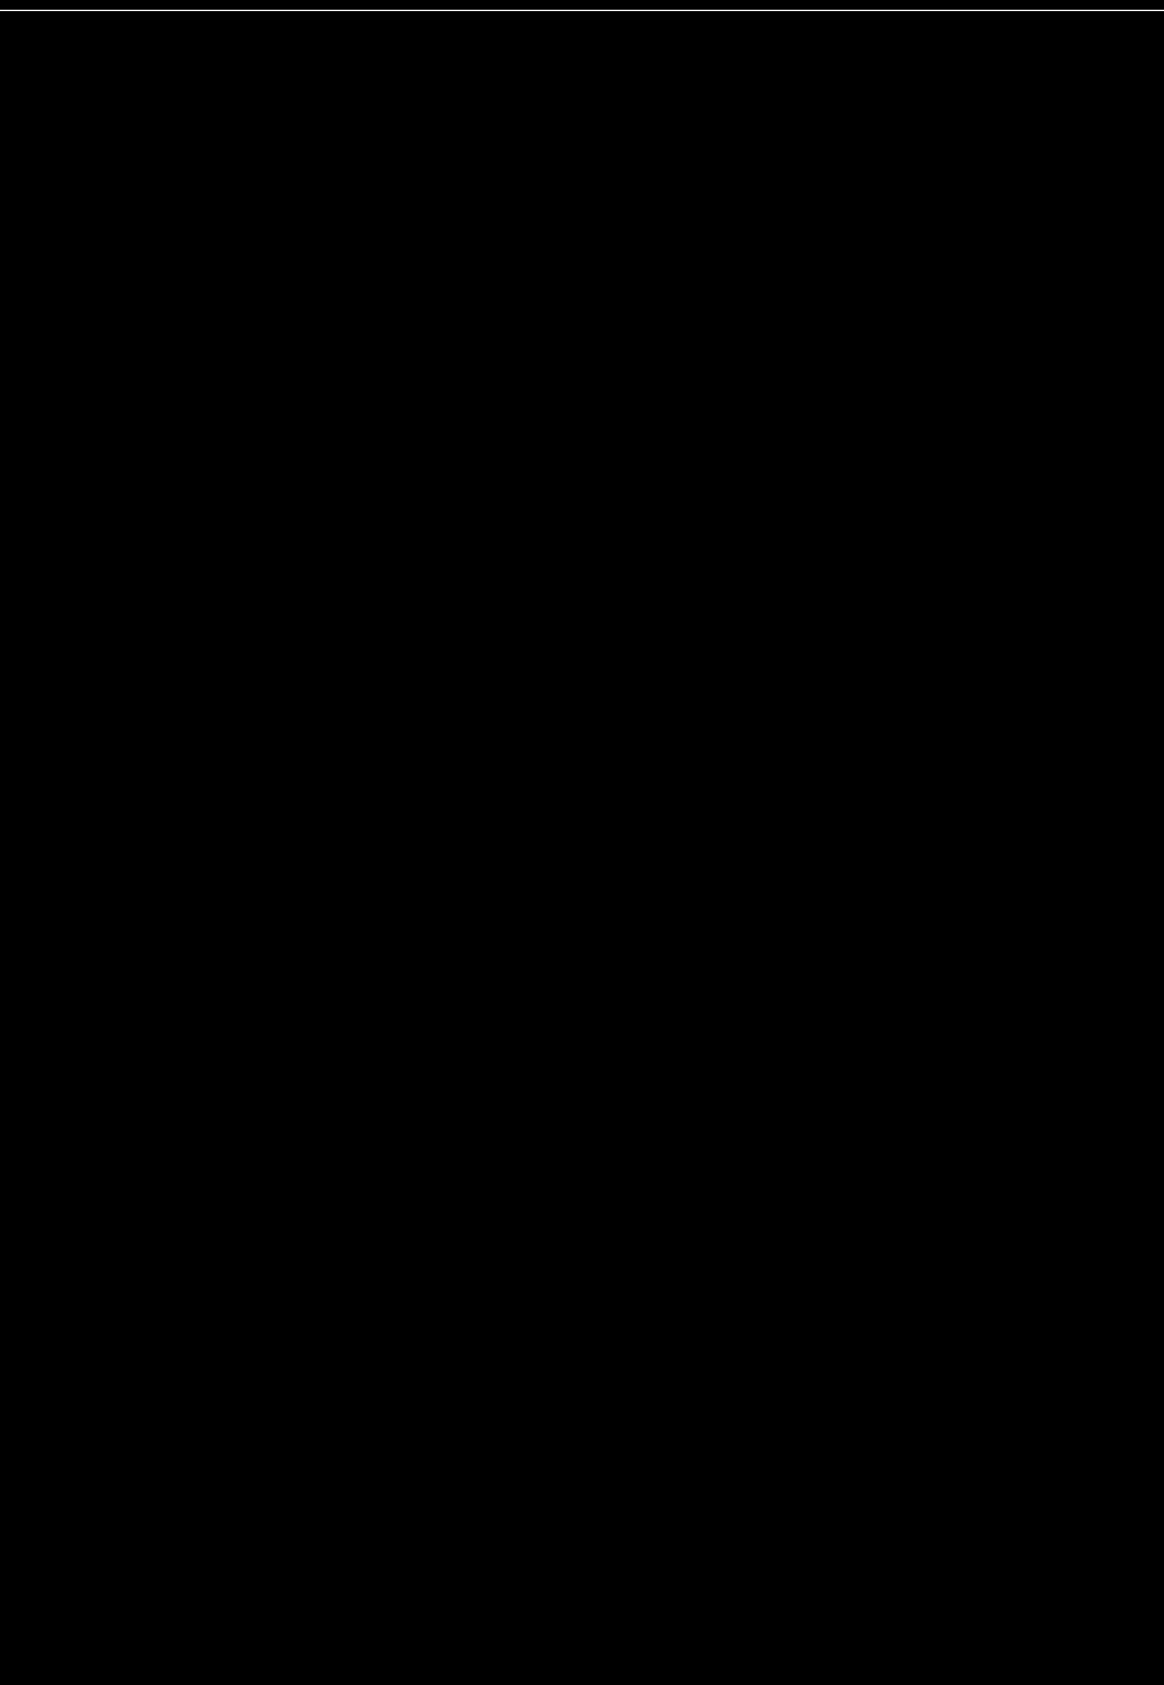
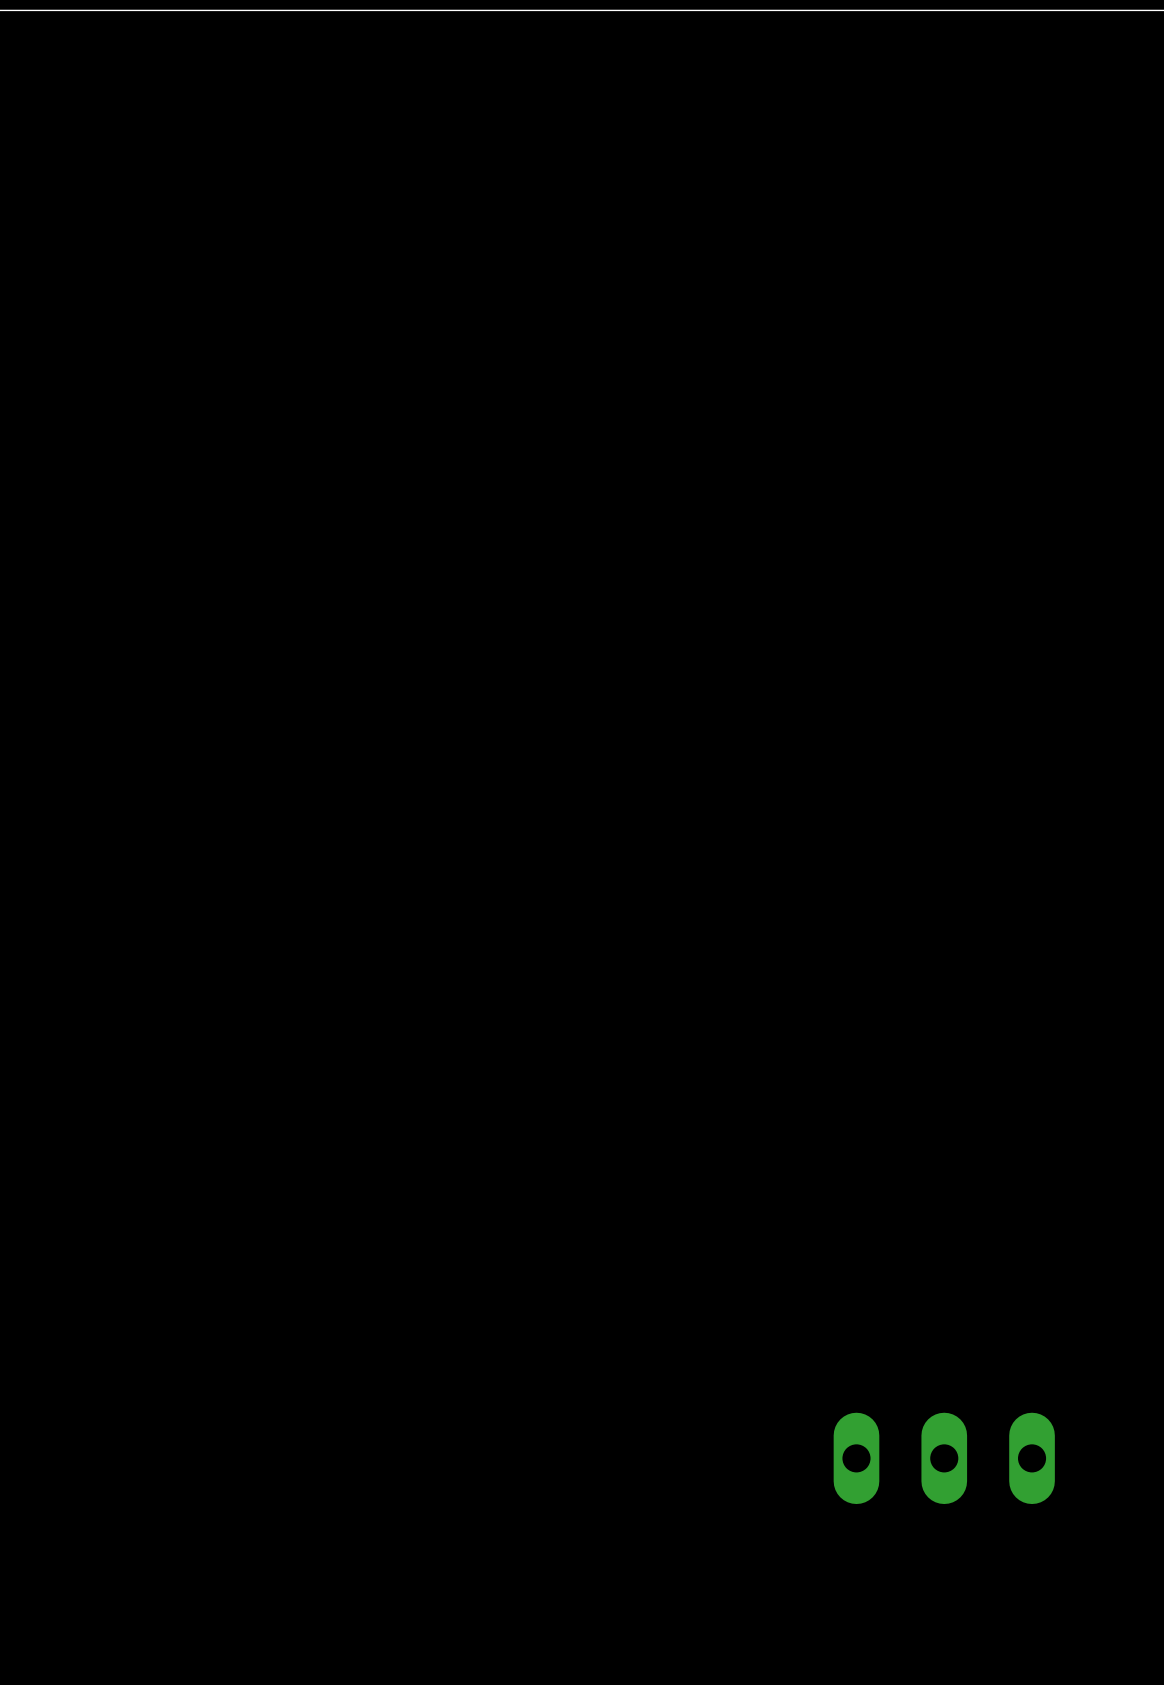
part: none -> (944, 1458)

